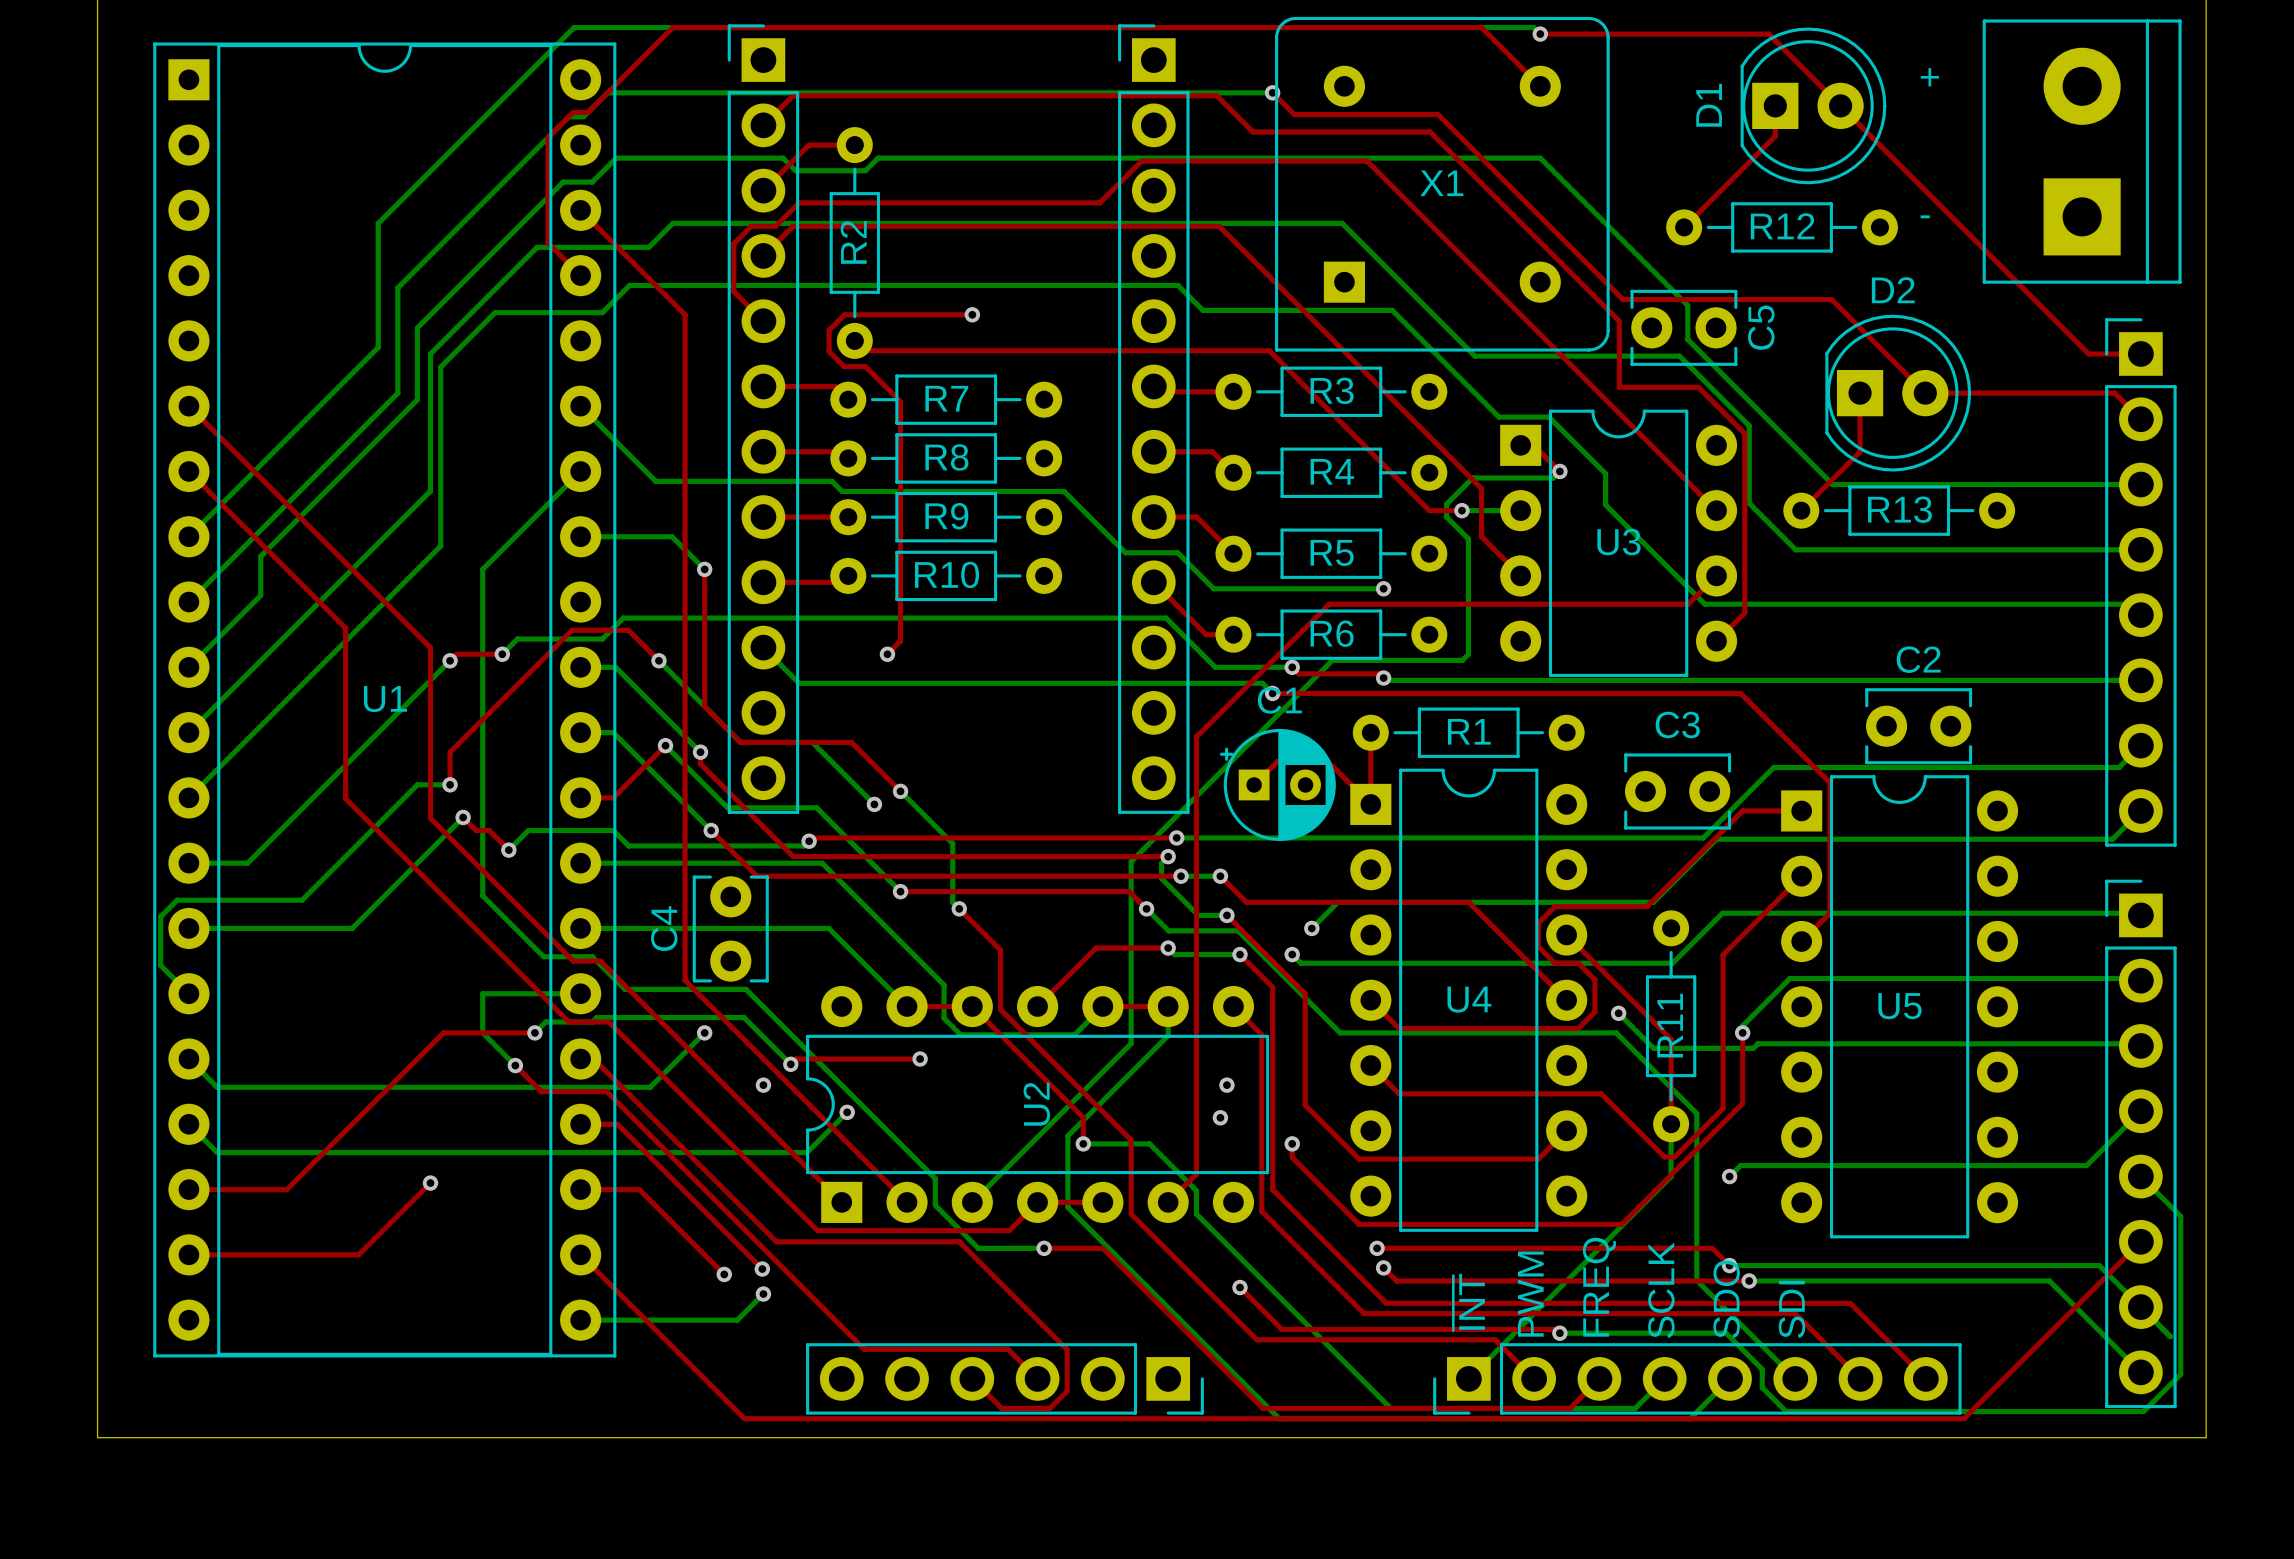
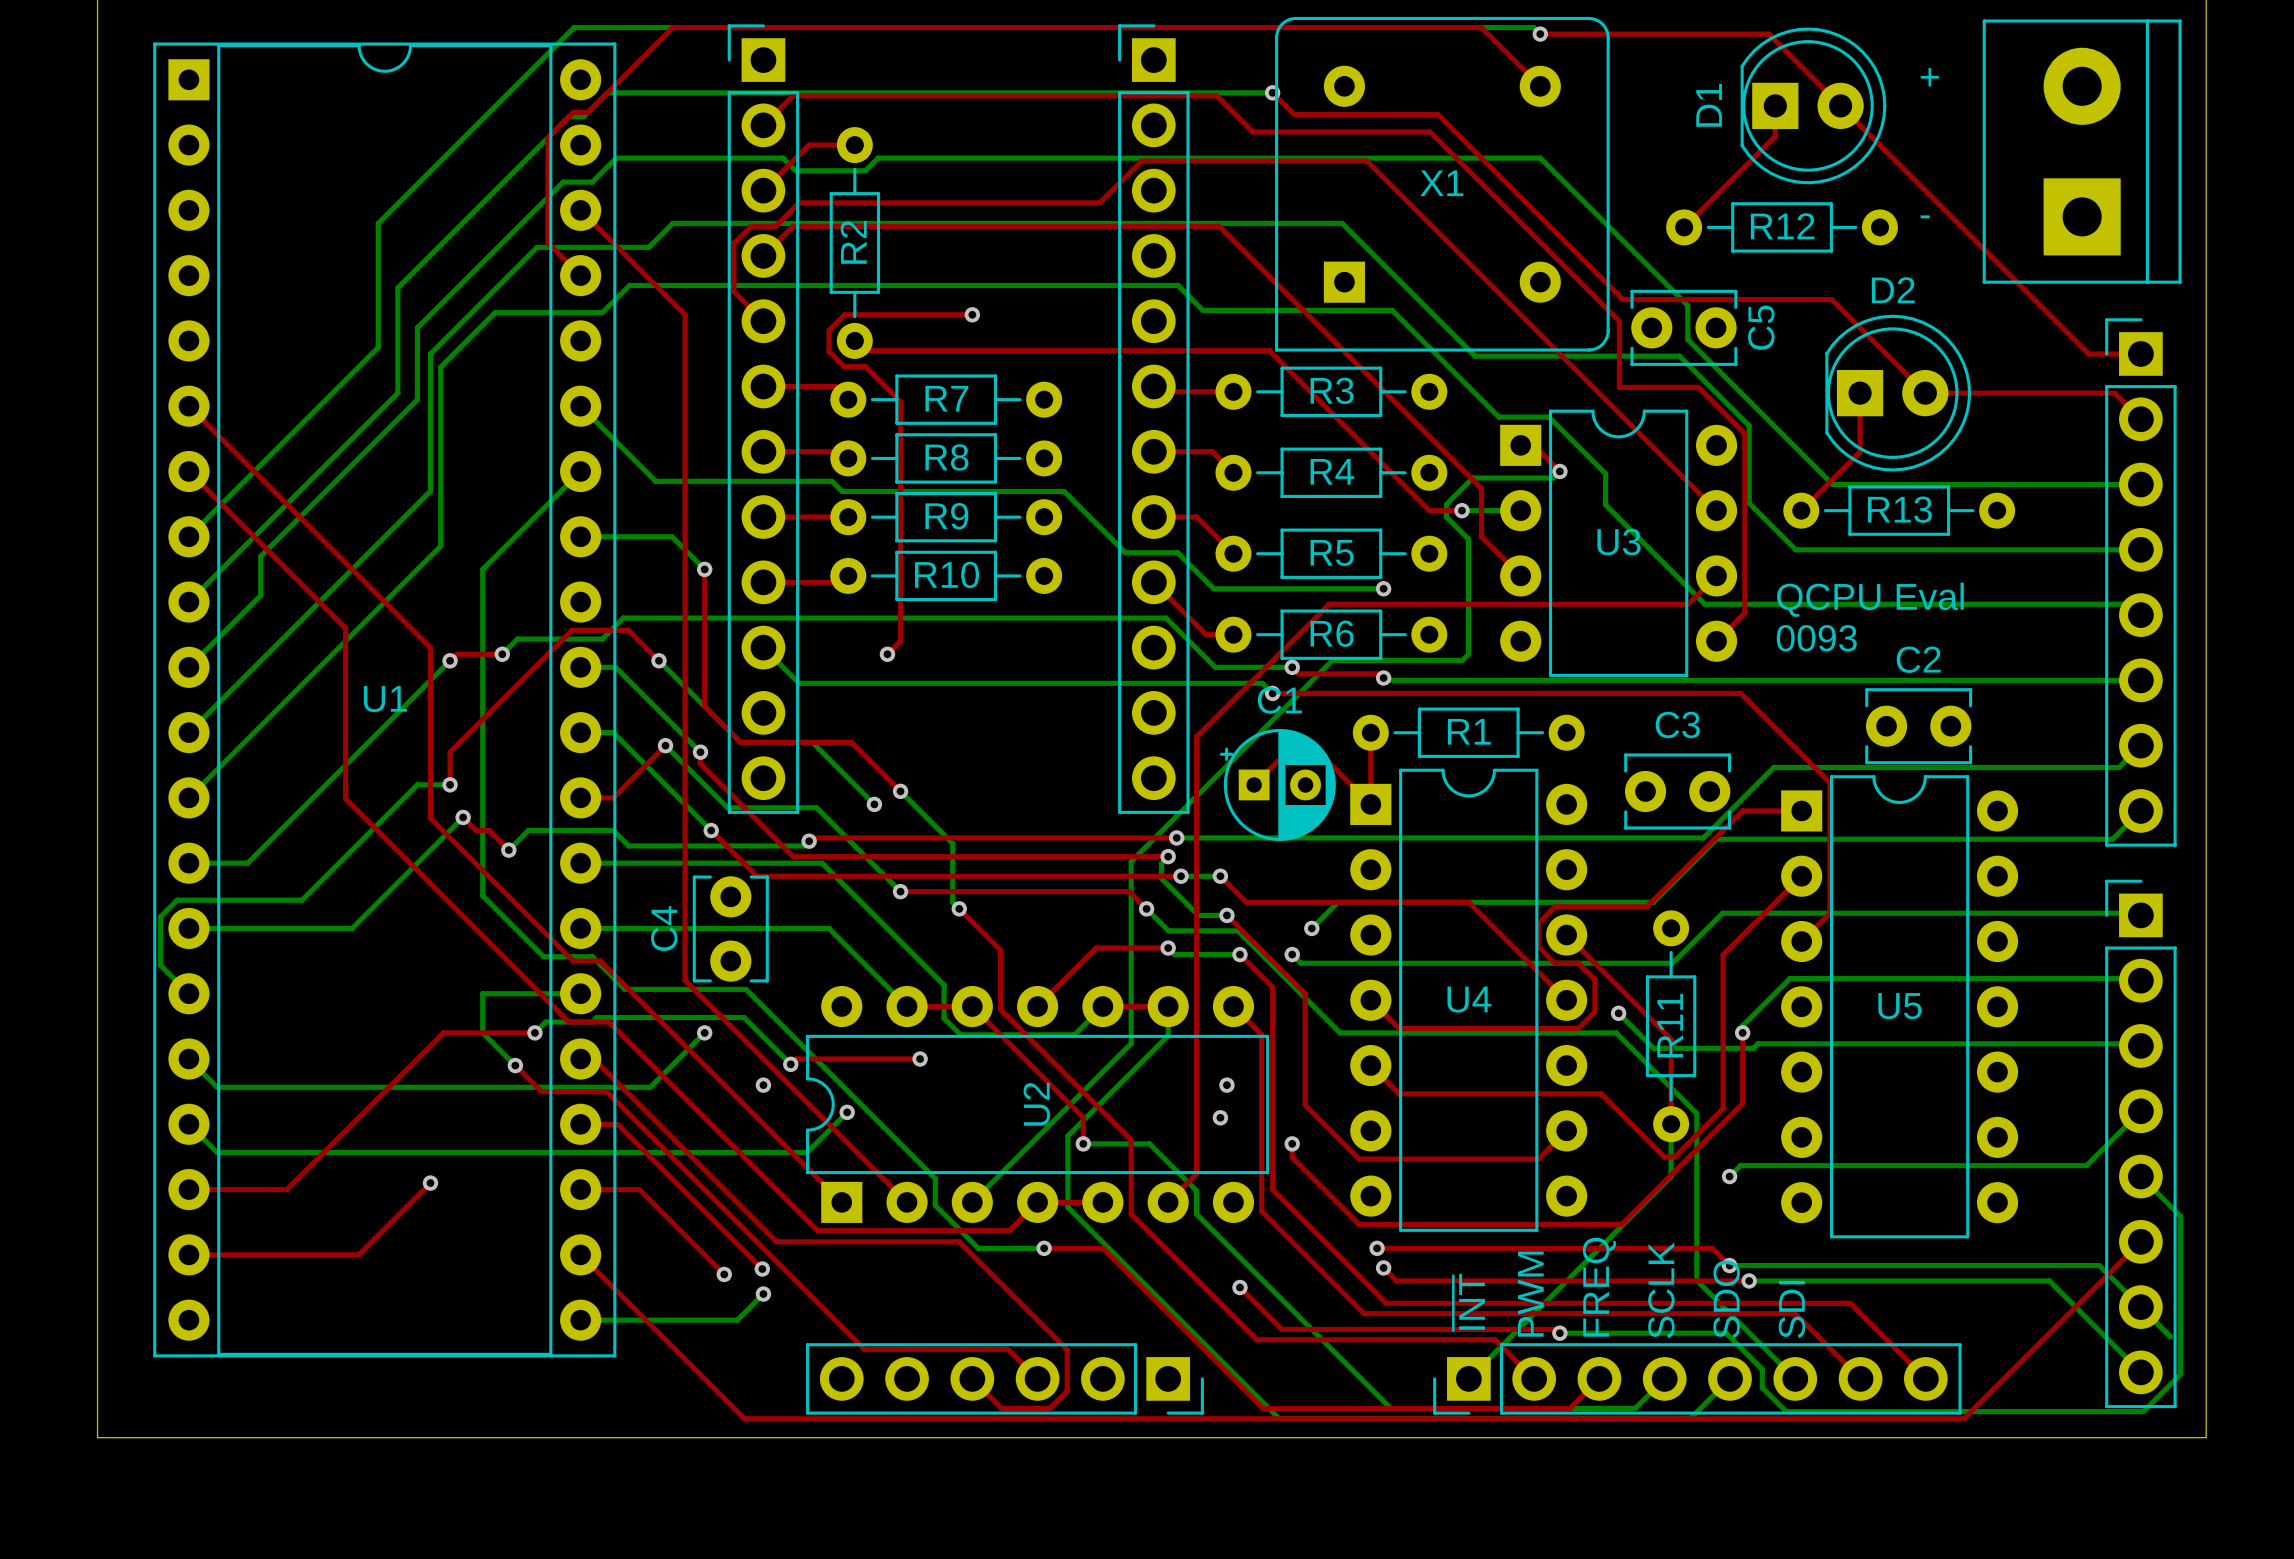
text: none -> QCPU Eval (1870, 599)
text: none -> 0093 (1816, 638)

